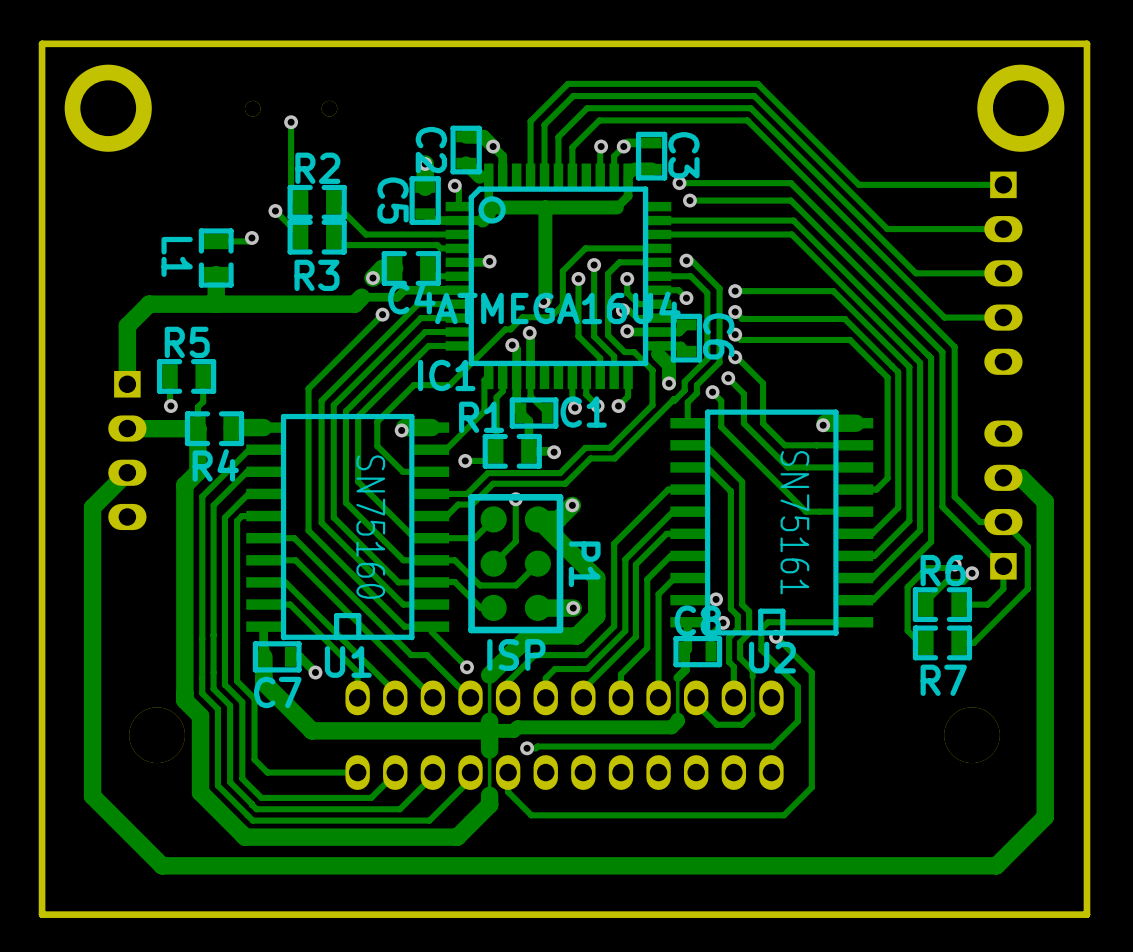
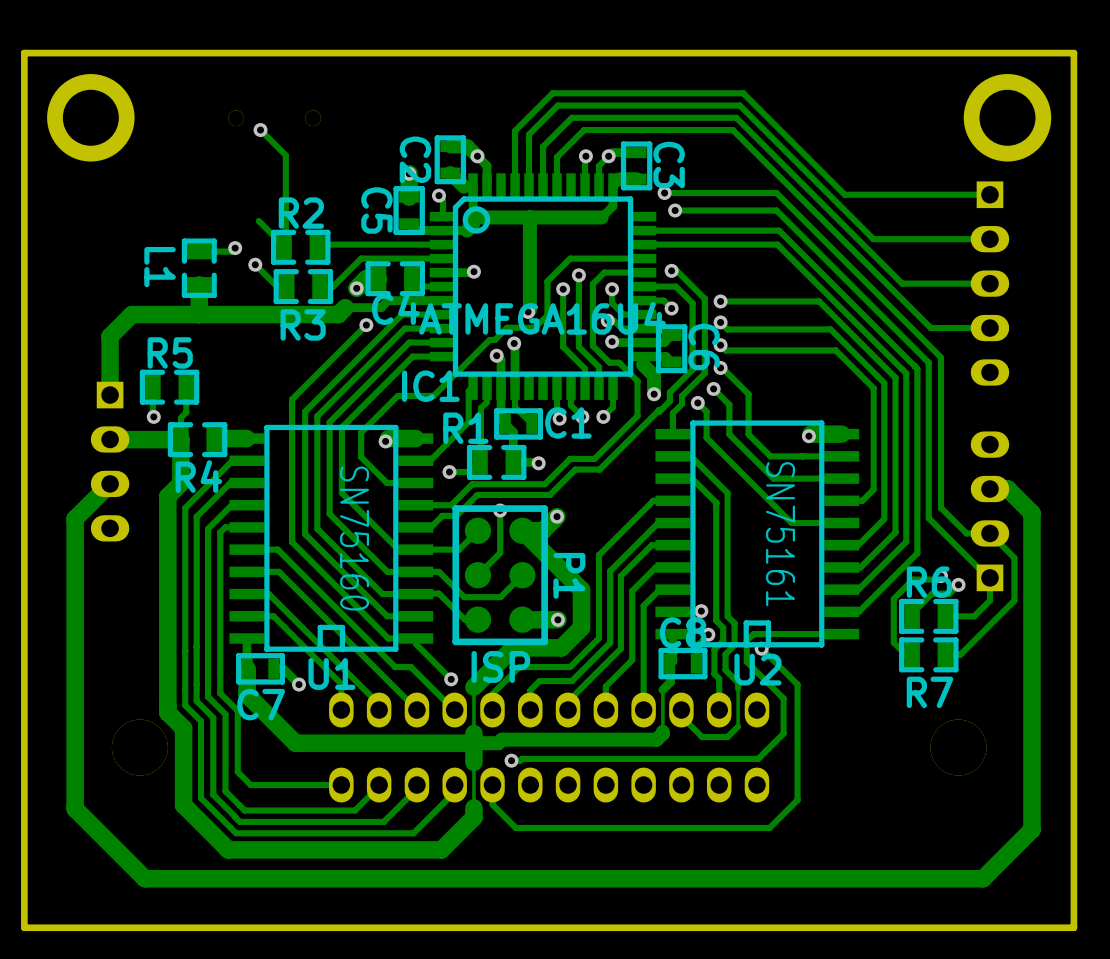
track: none -> (260, 130) (285, 155) (285, 250)
track: (291, 122) (291, 197) (296, 202) (300, 202) -> none
via position: (291, 122) -> (260, 130)
R2: (317, 202) -> none
track: (333, 202) (365, 234) -> (319, 250) (325, 244) (349, 244)
via position: (275, 211) -> (255, 264)
track: (333, 237) (341, 245) (437, 245) (440, 248) -> (320, 286) (333, 286) (361, 258) (424, 258)
track: none -> (255, 264) (277, 286) (286, 286)
R3 name: R3 (316, 275) -> R2 (301, 213)
R3: none -> (303, 286)

